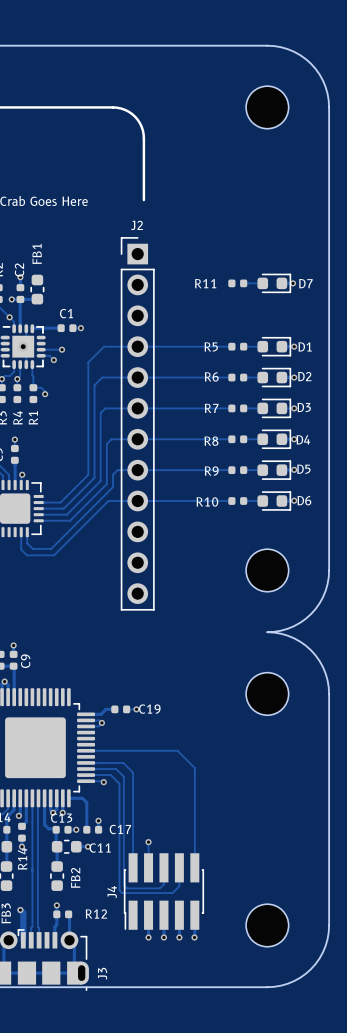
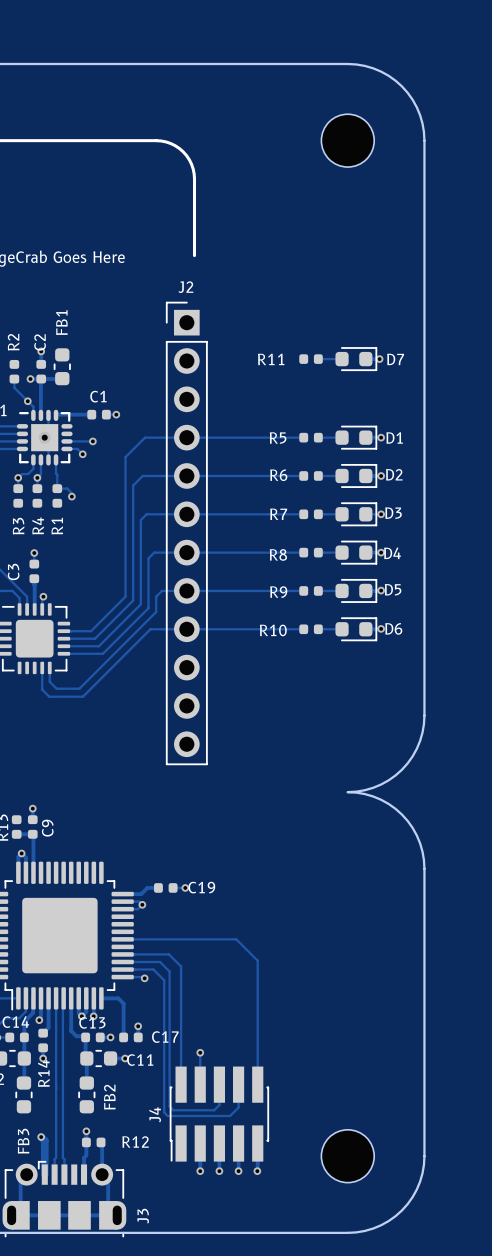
part: (267, 570) -> none
part: (267, 693) -> none

